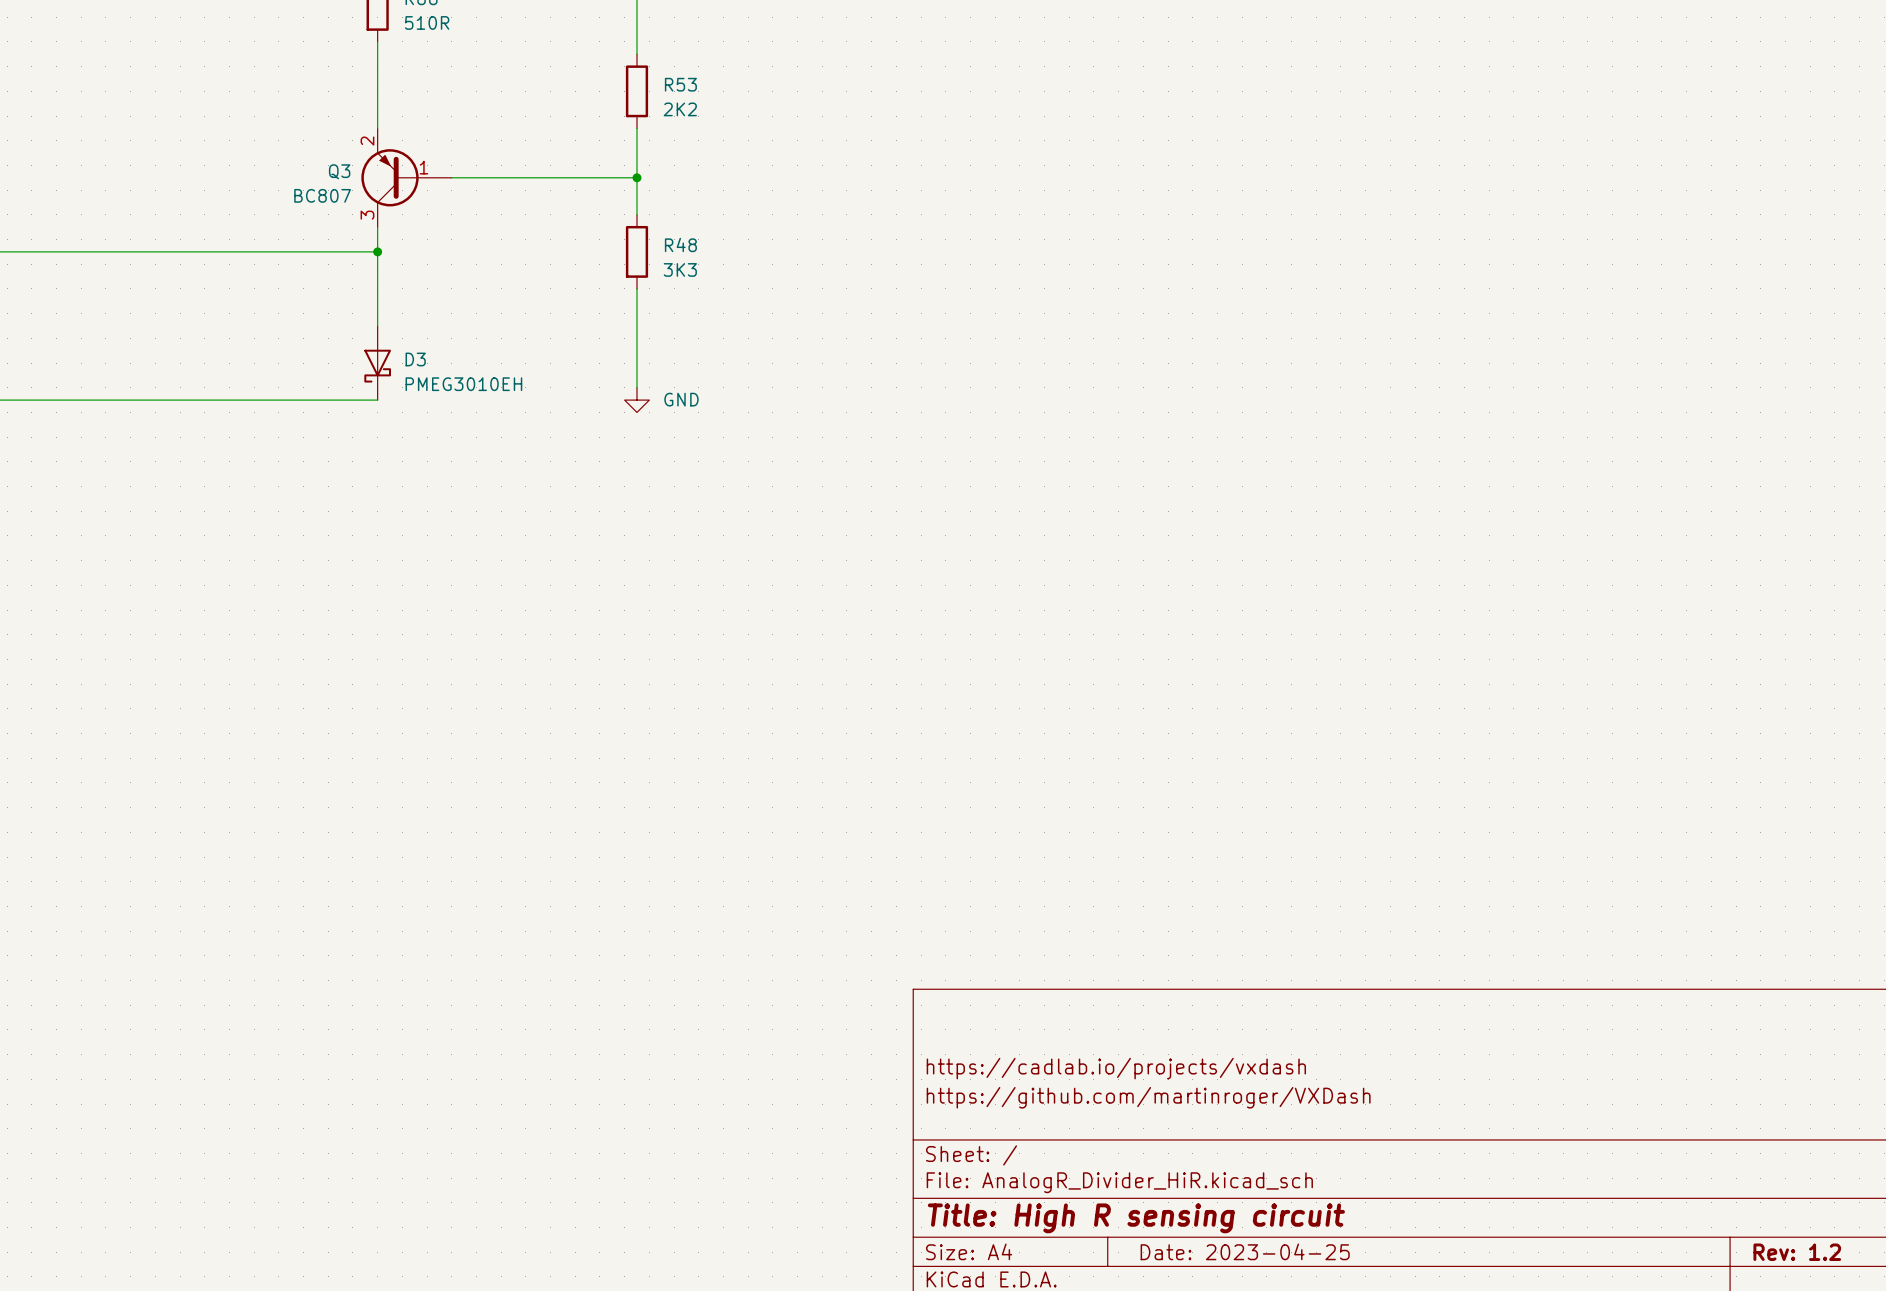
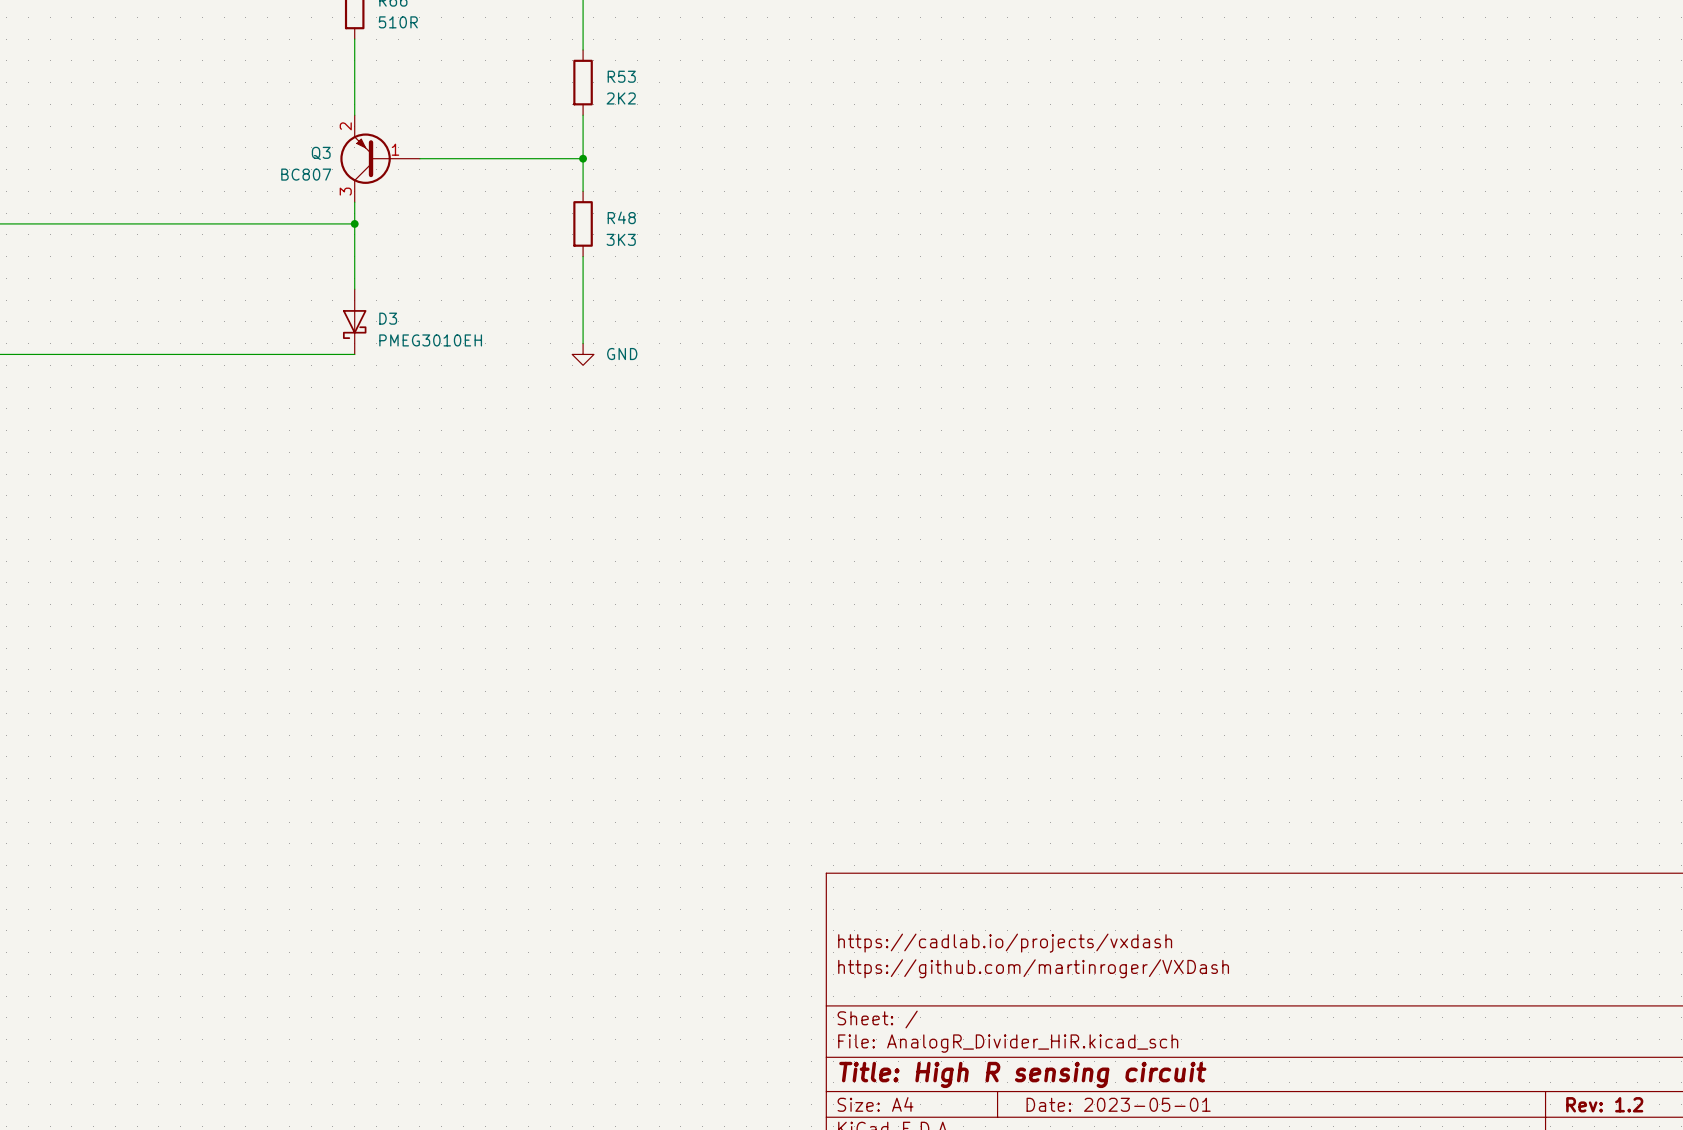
title block: Date: 2023-04-25 (1245, 1251) -> Date: 2023-05-01 (1118, 1104)

